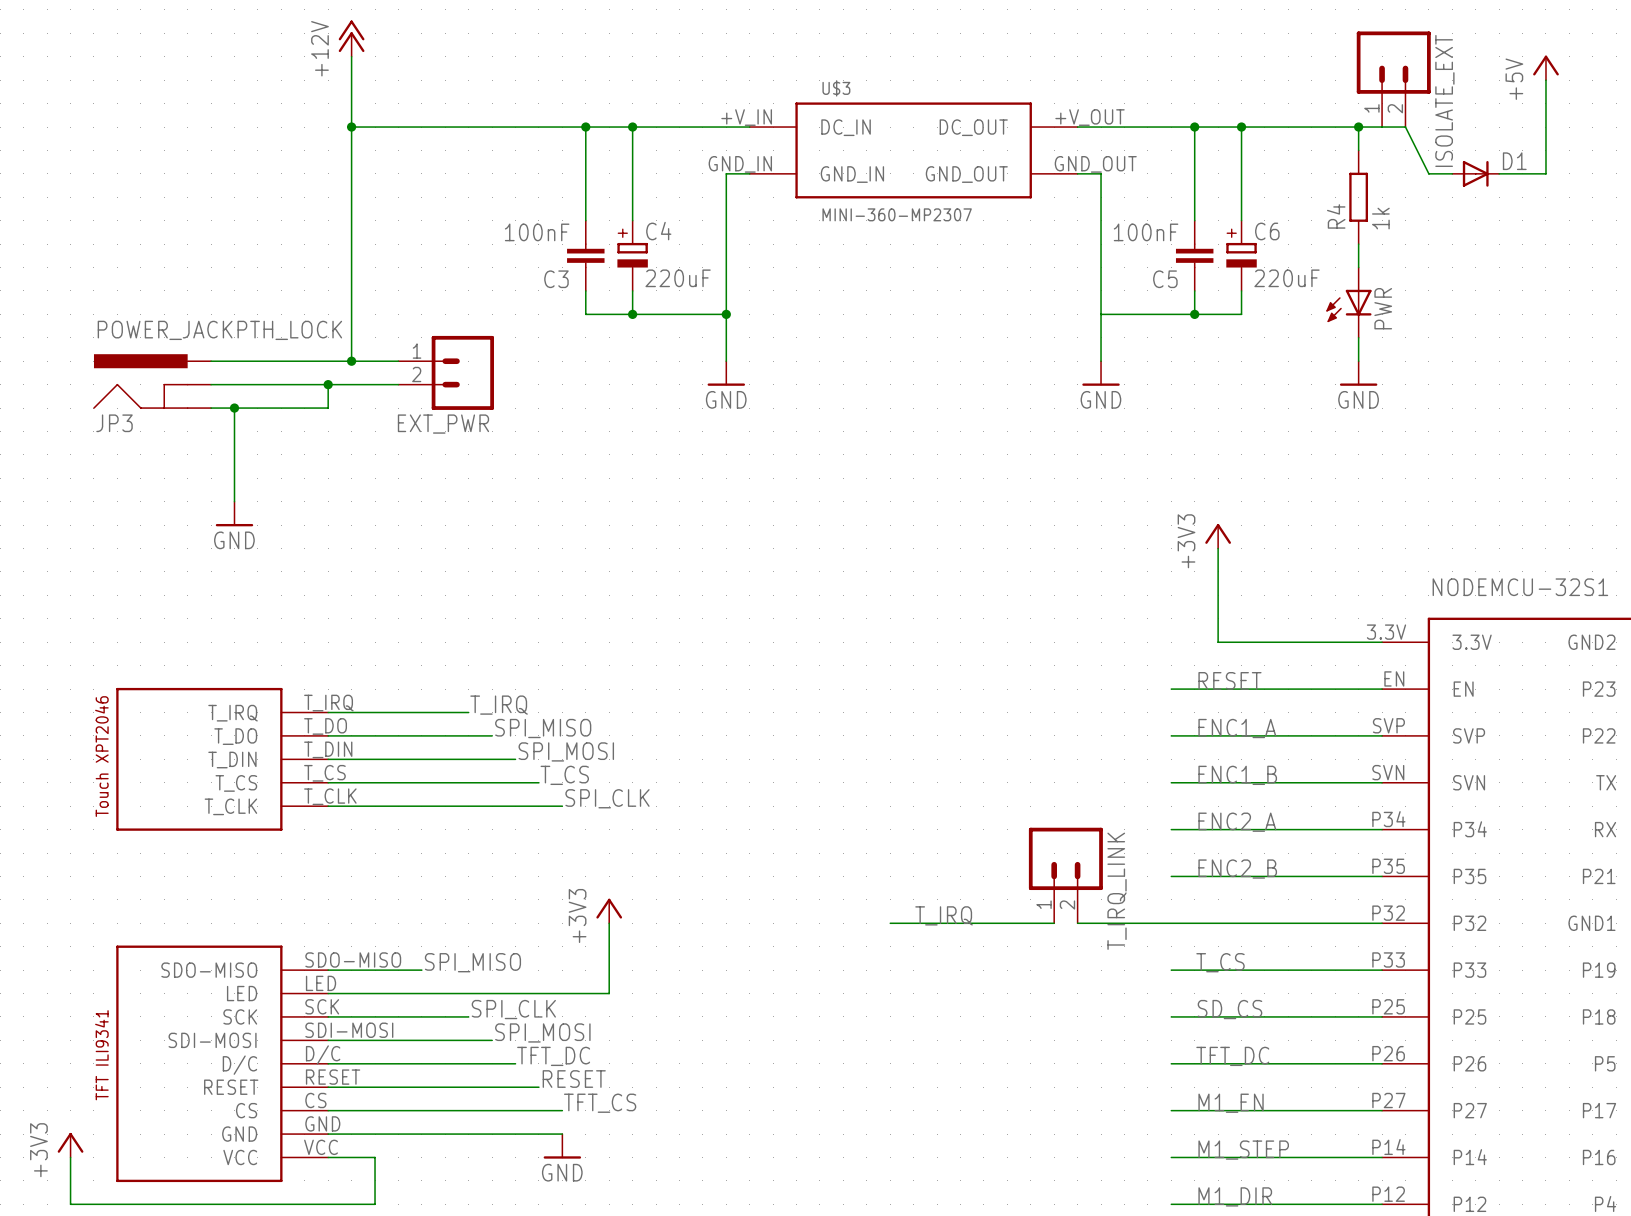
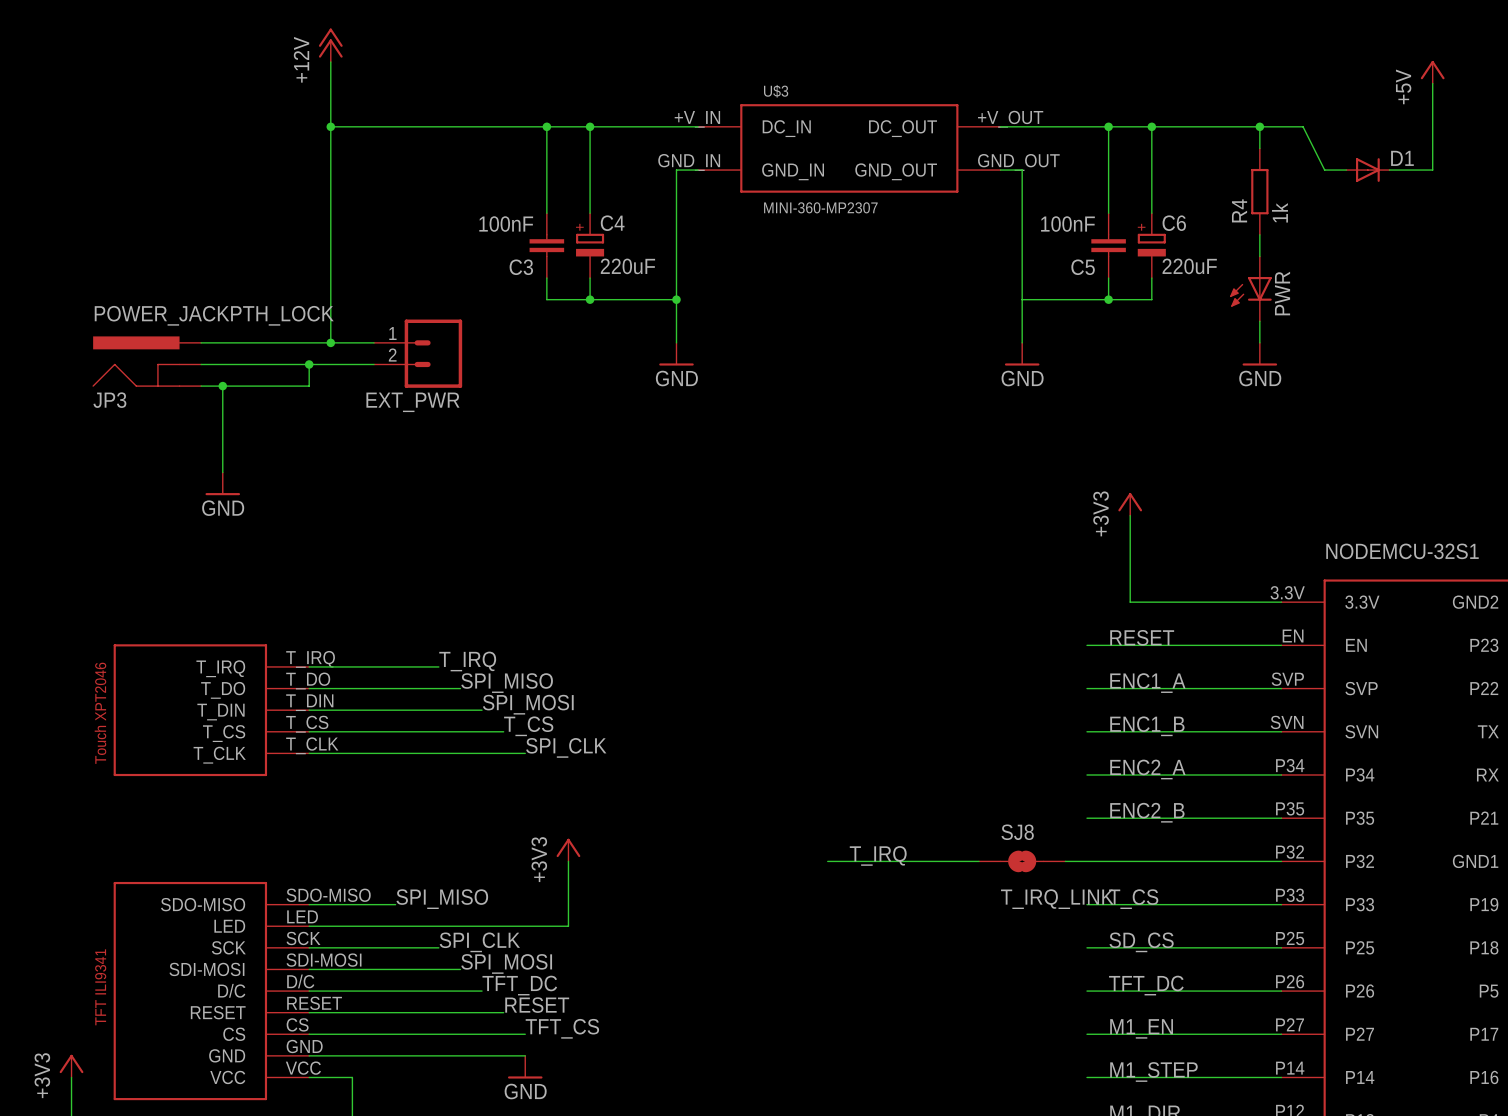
ISOLATE_EXT: (1393, 79) -> none
T_IRQ_LINK: (1065, 875) -> none
SJ8: none -> T_IRQ_LINK (1022, 861)

